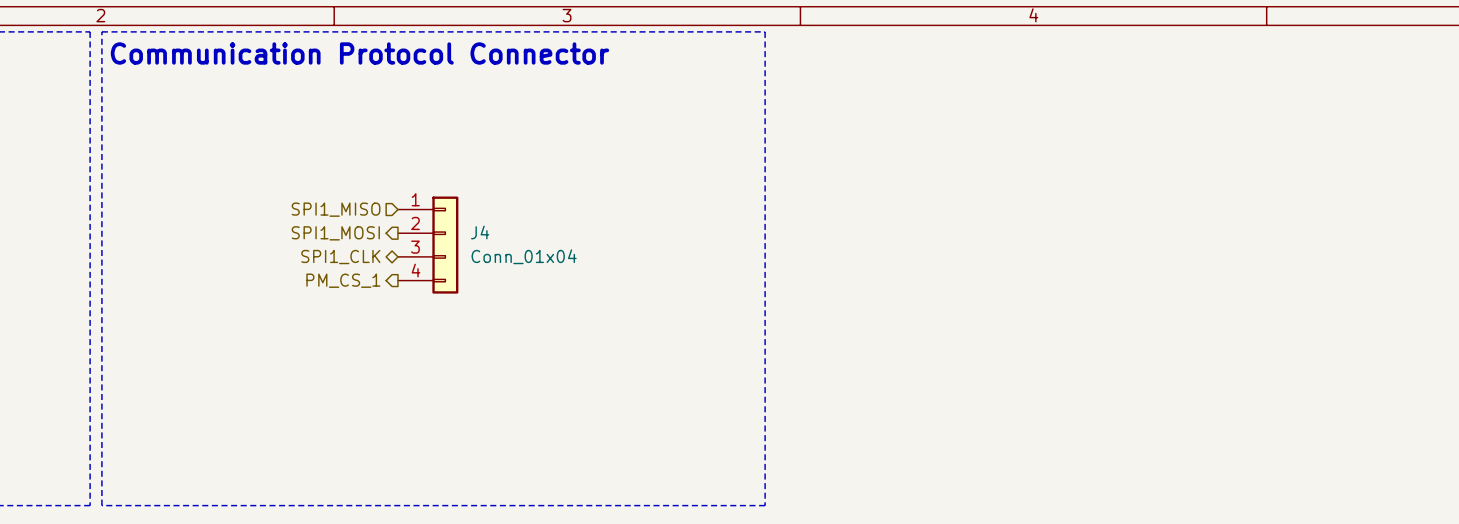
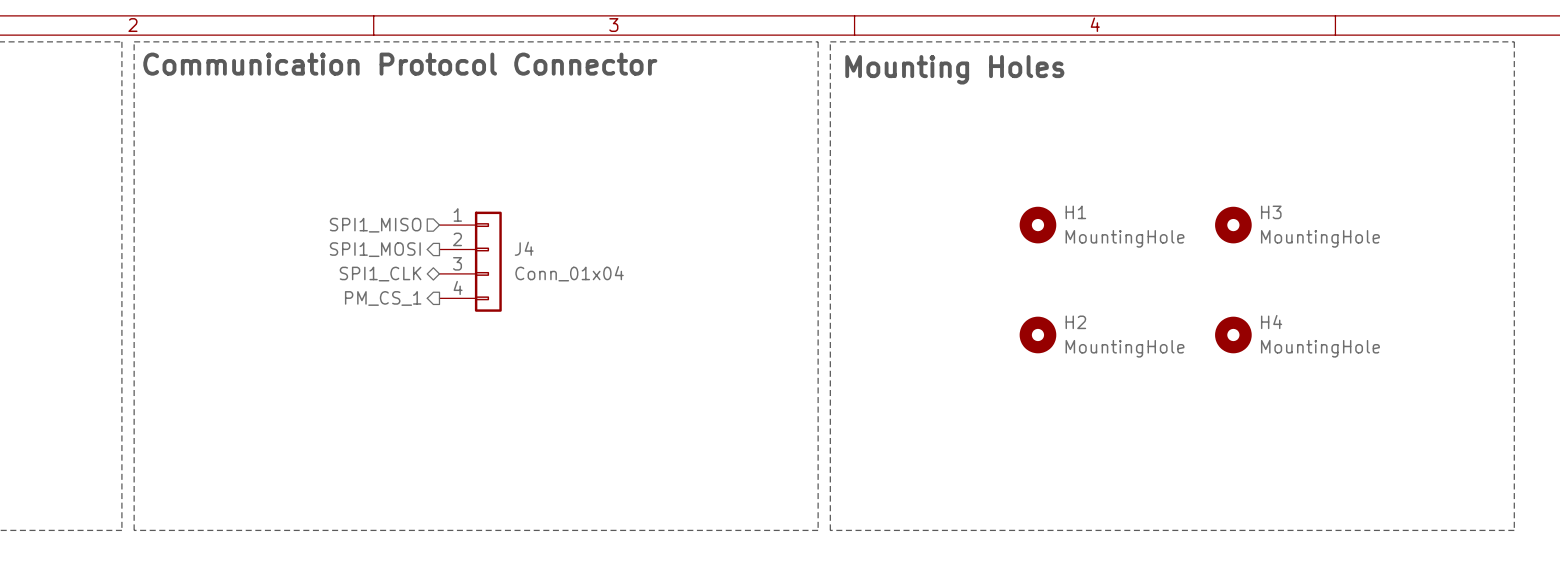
line: none -> (830, 41) (1514, 41) (1514, 530) (830, 530) (830, 41)
text: none -> Mounting Holes (954, 69)
H1: none -> MountingHole (1037, 225)
H3: none -> MountingHole (1233, 225)
H2: none -> MountingHole (1037, 334)
H4: none -> MountingHole (1233, 334)

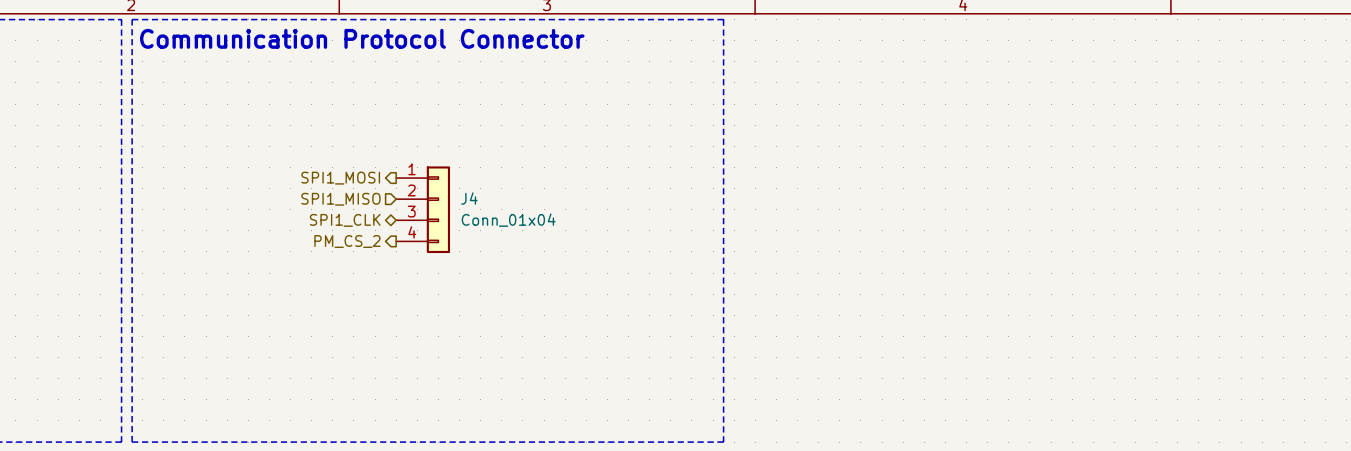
line: (830, 41) (1514, 41) (1514, 530) (830, 530) (830, 41) -> none
text: Mounting Holes (954, 69) -> none
hierarchical label shape: input (375, 225) -> output (340, 178)
hierarchical label: SPI1_MISO (375, 225) -> SPI1_MOSI (340, 178)
H1: MountingHole (1037, 225) -> none
H3: MountingHole (1233, 225) -> none
hierarchical label shape: output (375, 249) -> input (340, 199)
hierarchical label: SPI1_MOSI (375, 249) -> SPI1_MISO (340, 199)
hierarchical label: PM_CS_1 (383, 298) -> PM_CS_2 (347, 241)
H2: MountingHole (1037, 334) -> none
H4: MountingHole (1233, 334) -> none

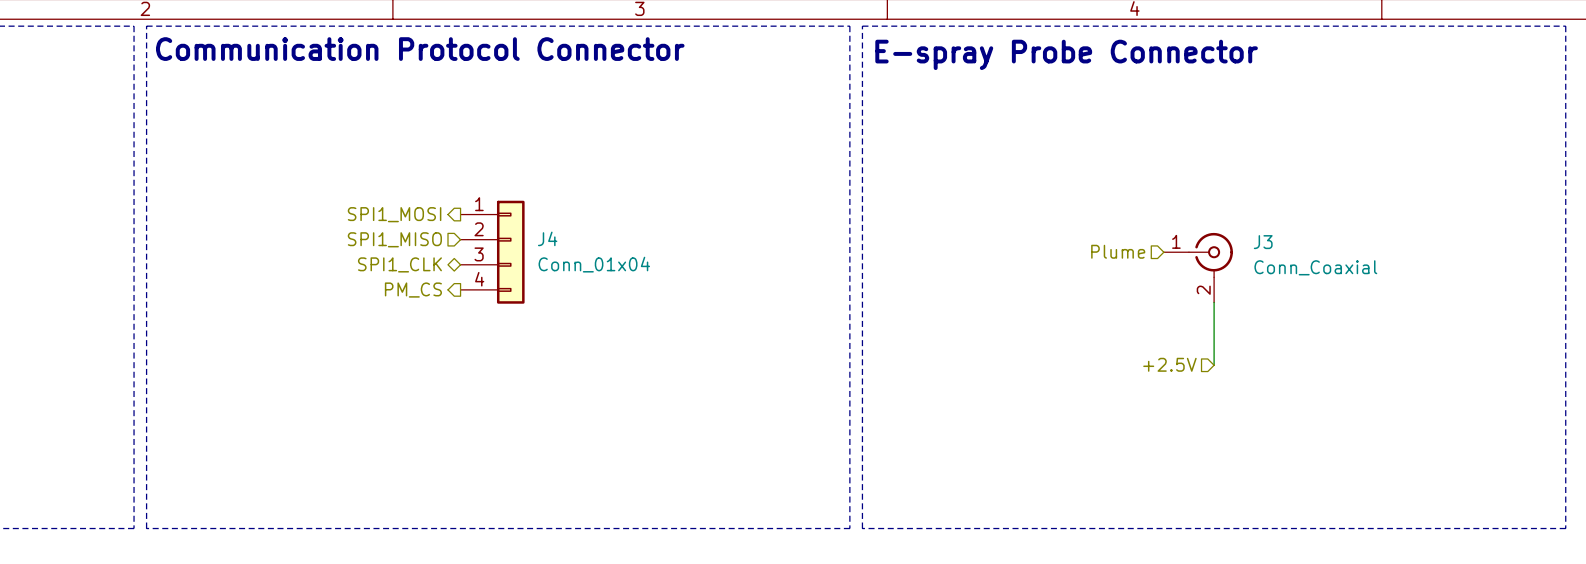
line: none -> (862, 26) (1565, 26) (1565, 528) (862, 528) (862, 26)
text: none -> E-spray Probe Connector (1066, 54)
hierarchical label: none -> Plume (1118, 251)
J3: none -> Conn_Coaxial (1198, 267)
hierarchical label: PM_CS_2 (347, 241) -> PM_CS (413, 290)
wire: none -> (1214, 302) (1214, 365)
hierarchical label: none -> +2.5V (1169, 364)

